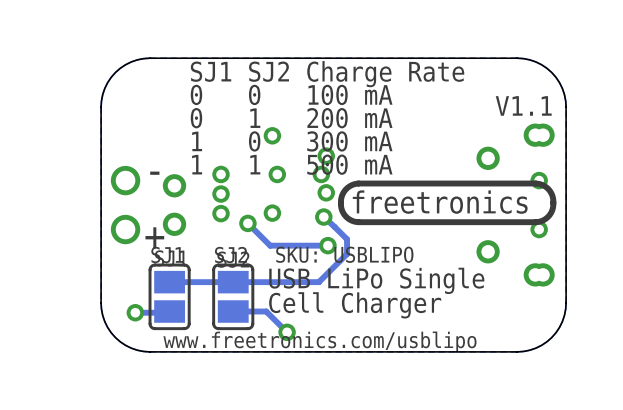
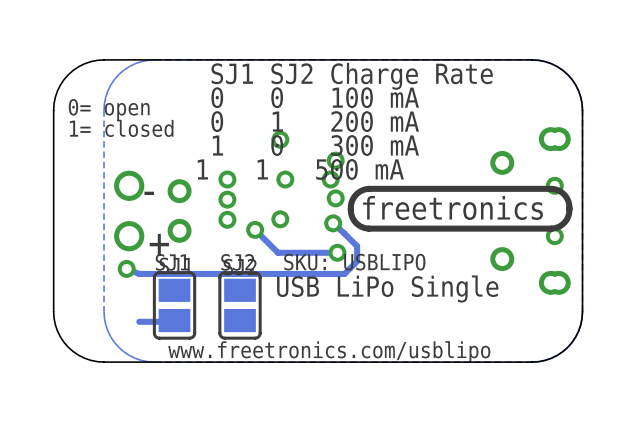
board edge: (150, 58) (131, 61) (115, 72) (104, 88) (101, 107) (101, 302) (102, 315) (111, 332) (120, 341) (137, 350) (150, 351) -> (154, 59) (97, 60) (78, 66) (68, 74) (60, 85) (55, 97) (53, 110) (53, 311) (57, 331) (68, 347) (78, 355) (90, 360) (154, 362)
text position: SJ1 SJ2 Charge Rate (327, 74) -> SJ1 SJ2 Charge Rate (352, 76)
text position: 0 0 100 mA (291, 94) -> 0 0 100 mA (315, 97)
text: V1.1 (523, 105) -> none
text: none -> 0= open (109, 109)
text position: 0 1 200 mA (291, 118) -> 0 1 200 mA (315, 121)
text: none -> 1= closed (121, 128)
text position: 1 0 300 mA (292, 141) -> 1 0 300 mA (315, 145)
text position: - (154, 173) -> - (149, 193)
track: (334, 266) (318, 282) (169, 282) -> (344, 273) (139, 273) (126, 268)
text: Cell Charger (355, 305) -> none
track: (233, 311) (266, 311) (287, 332) -> none
via position: (135, 312) -> (126, 268)
via: (287, 332) -> none

